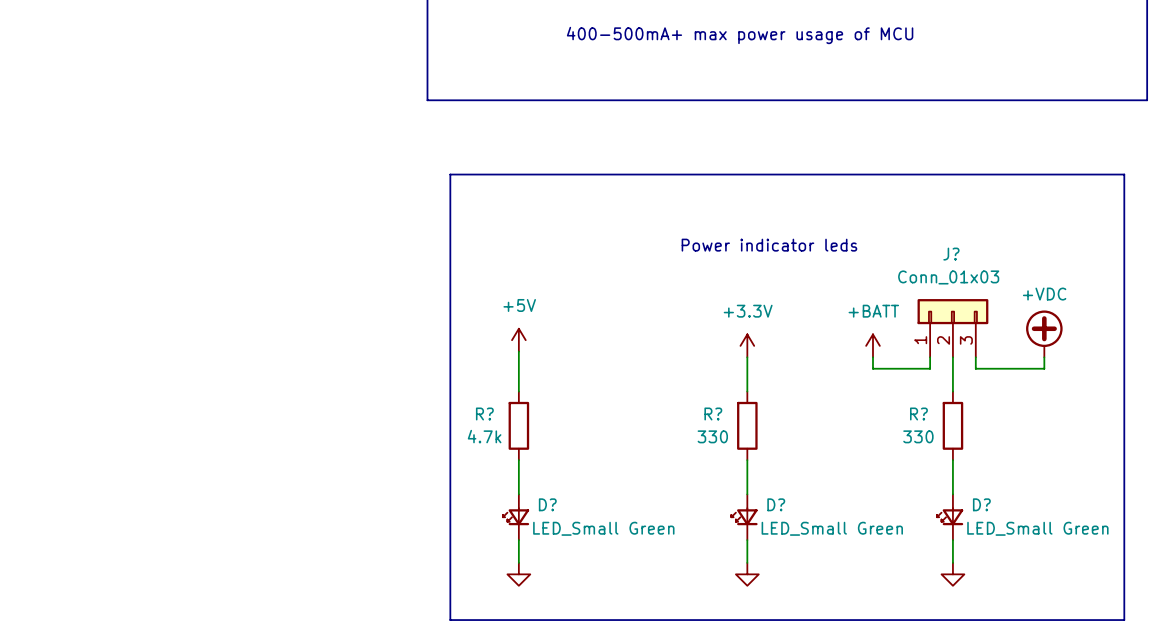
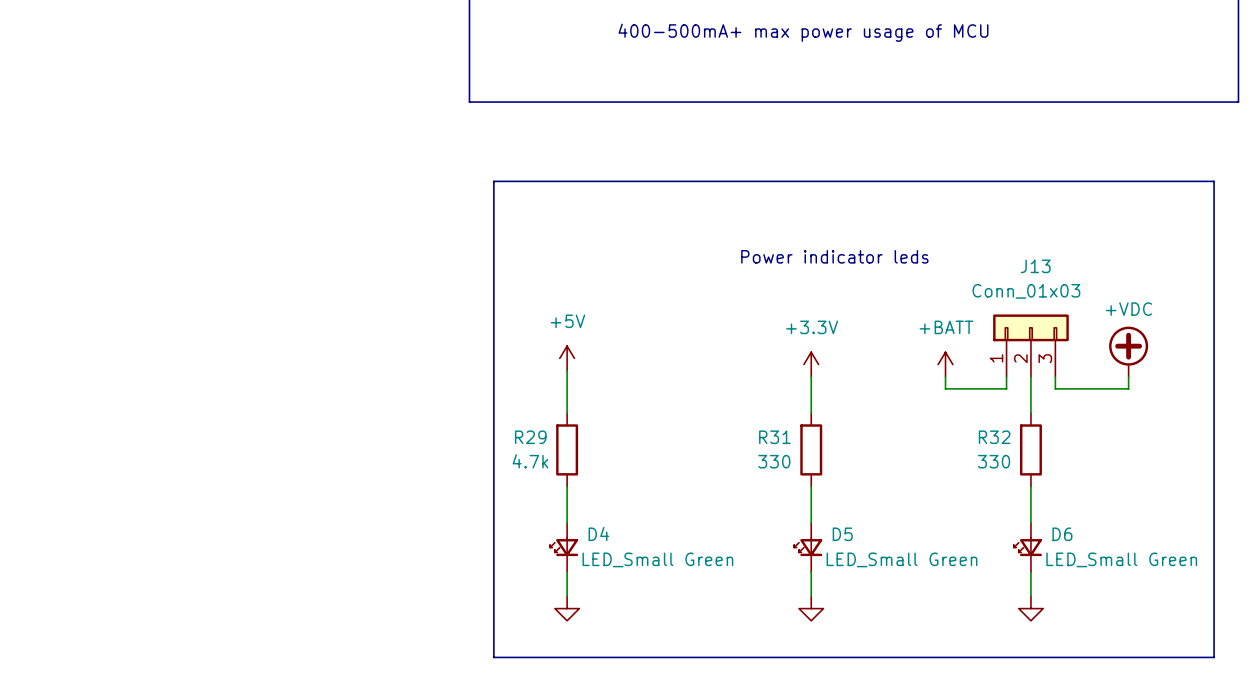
J? name: J? (951, 254) -> J13 (1035, 266)
R? name: R? (484, 414) -> R29 (530, 437)
R? name: R? (713, 414) -> R31 (774, 437)
R? name: R? (918, 414) -> R32 (994, 437)
D? name: D? (547, 504) -> D4 (598, 534)
D? name: D? (776, 504) -> D5 (842, 534)
D? name: D? (981, 504) -> D6 (1062, 534)

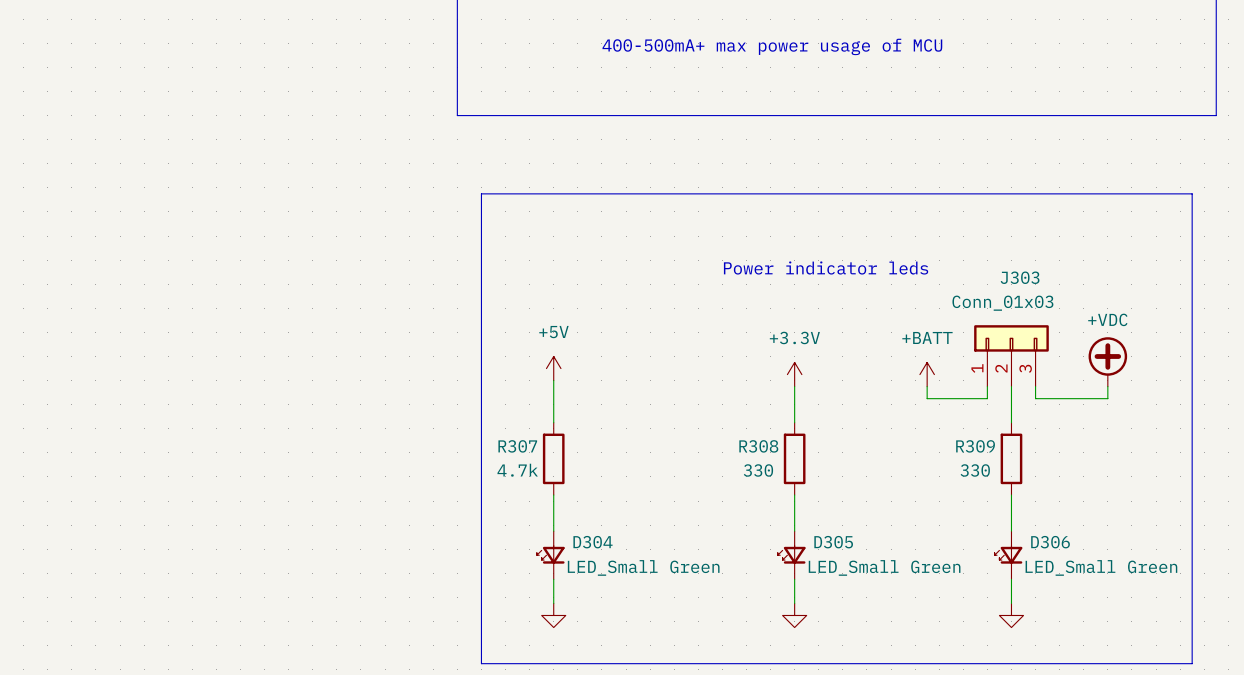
J13 name: J13 (1035, 266) -> J303 (1020, 277)
R29 name: R29 (530, 437) -> R307 (517, 446)
R31 name: R31 (774, 437) -> R308 (758, 446)
R32 name: R32 (994, 437) -> R309 (975, 446)
D4 name: D4 (598, 534) -> D304 (593, 542)
D5 name: D5 (842, 534) -> D305 (833, 542)
D6 name: D6 (1062, 534) -> D306 (1050, 542)

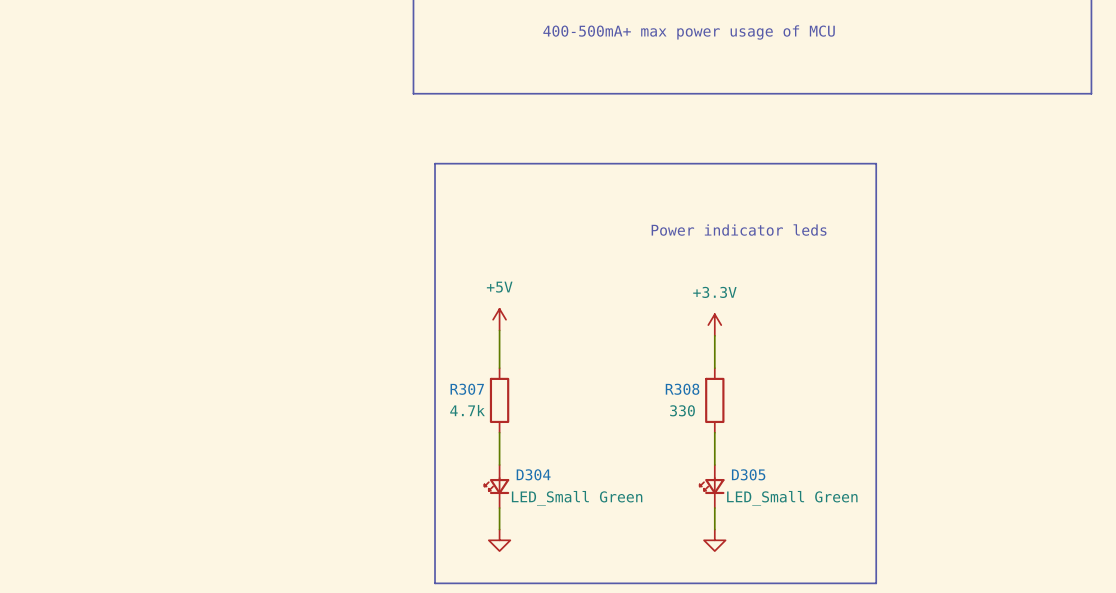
line: (975, 193) (1192, 193) (1192, 663) (975, 663) -> (876, 163) (876, 583)
J303: Conn_01x03 (1011, 355) -> none
power symbol: +VDC (1107, 361) -> none
power symbol: +BATT (927, 374) -> none
wire: (927, 386) (927, 398) (987, 398) (987, 386) -> none
wire: (1011, 386) (1011, 422) -> none
wire: (1035, 386) (1035, 398) (1107, 398) (1107, 386) -> none
R309: 330 (1011, 458) -> none
wire: (1011, 495) (1011, 531) -> none
D306: LED_Small Green (1008, 555) -> none
wire: (1011, 579) (1011, 603) -> none
power symbol: (1011, 615) -> none

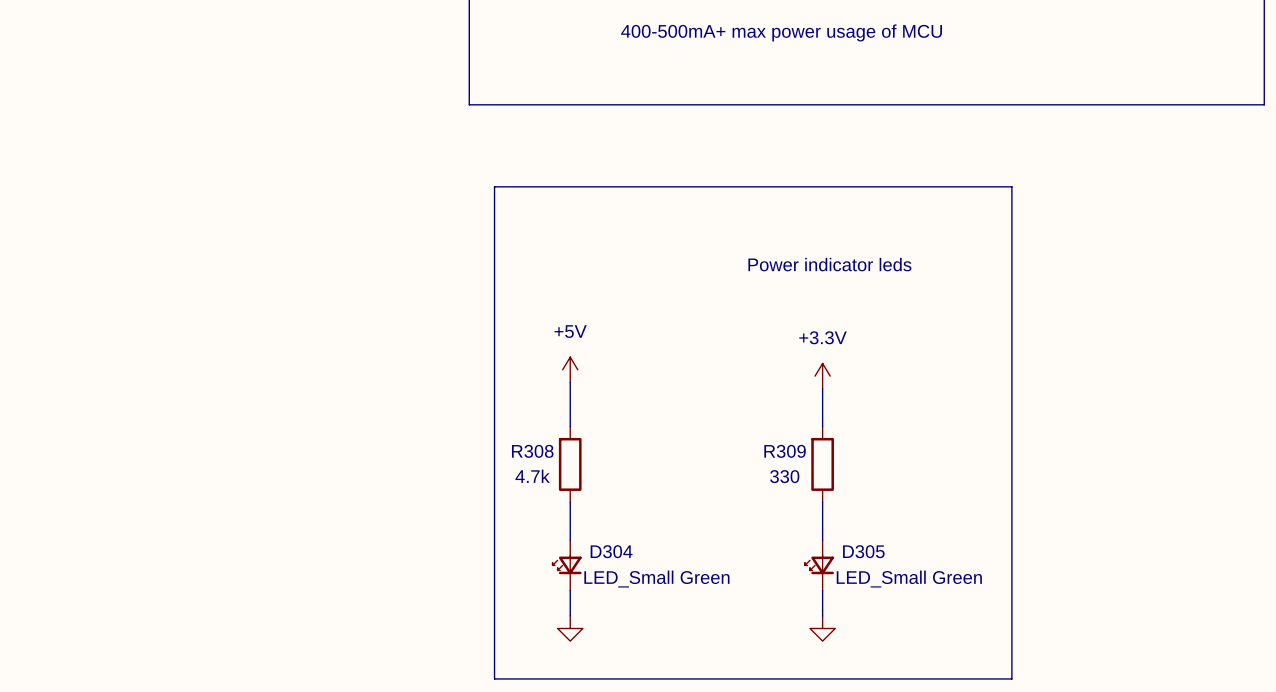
R307 name: R307 (467, 389) -> R308 (532, 451)
R308 name: R308 (682, 389) -> R309 (785, 451)

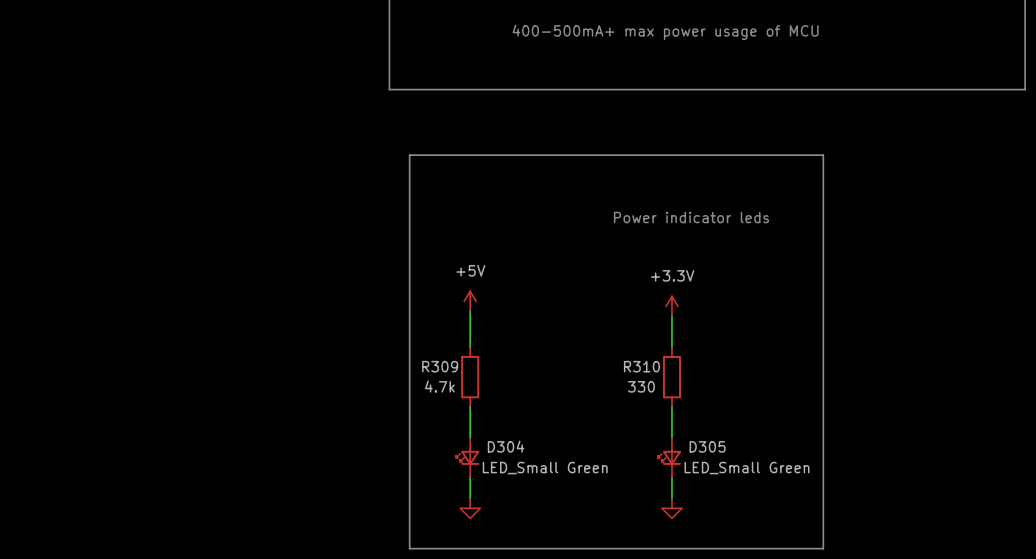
R308 name: R308 (532, 451) -> R309 (440, 366)
R309 name: R309 (785, 451) -> R310 (641, 366)

